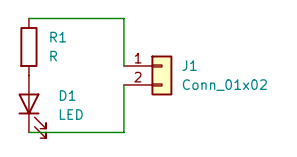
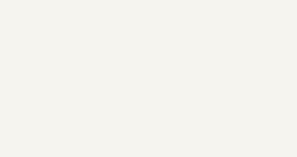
wire: (28, 18) (123, 18) (123, 65) -> none
R1: R (28, 46) -> none
J1: Conn_01x02 (148, 75) -> none
wire: (123, 84) (123, 132) (28, 132) -> none
D1: LED (32, 106) -> none

